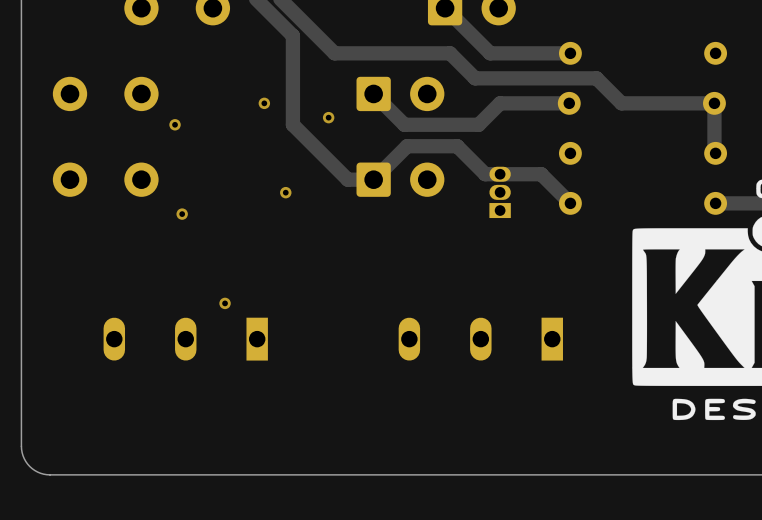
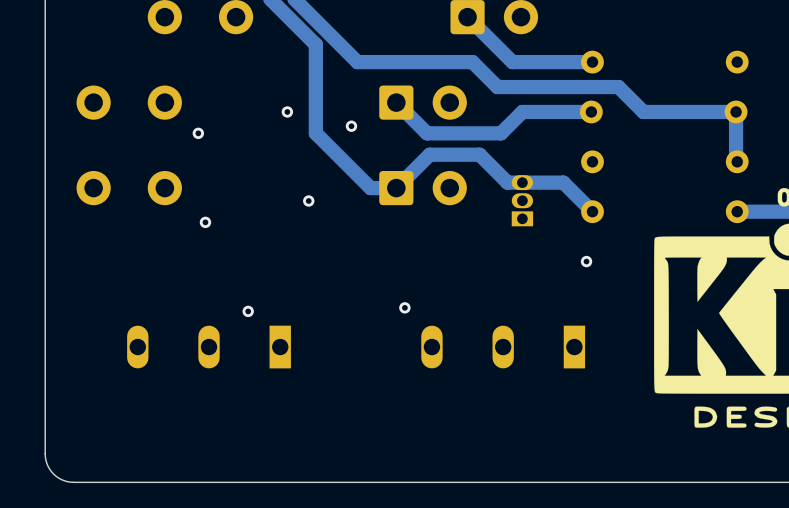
via: none -> (586, 261)
via: none -> (404, 307)

